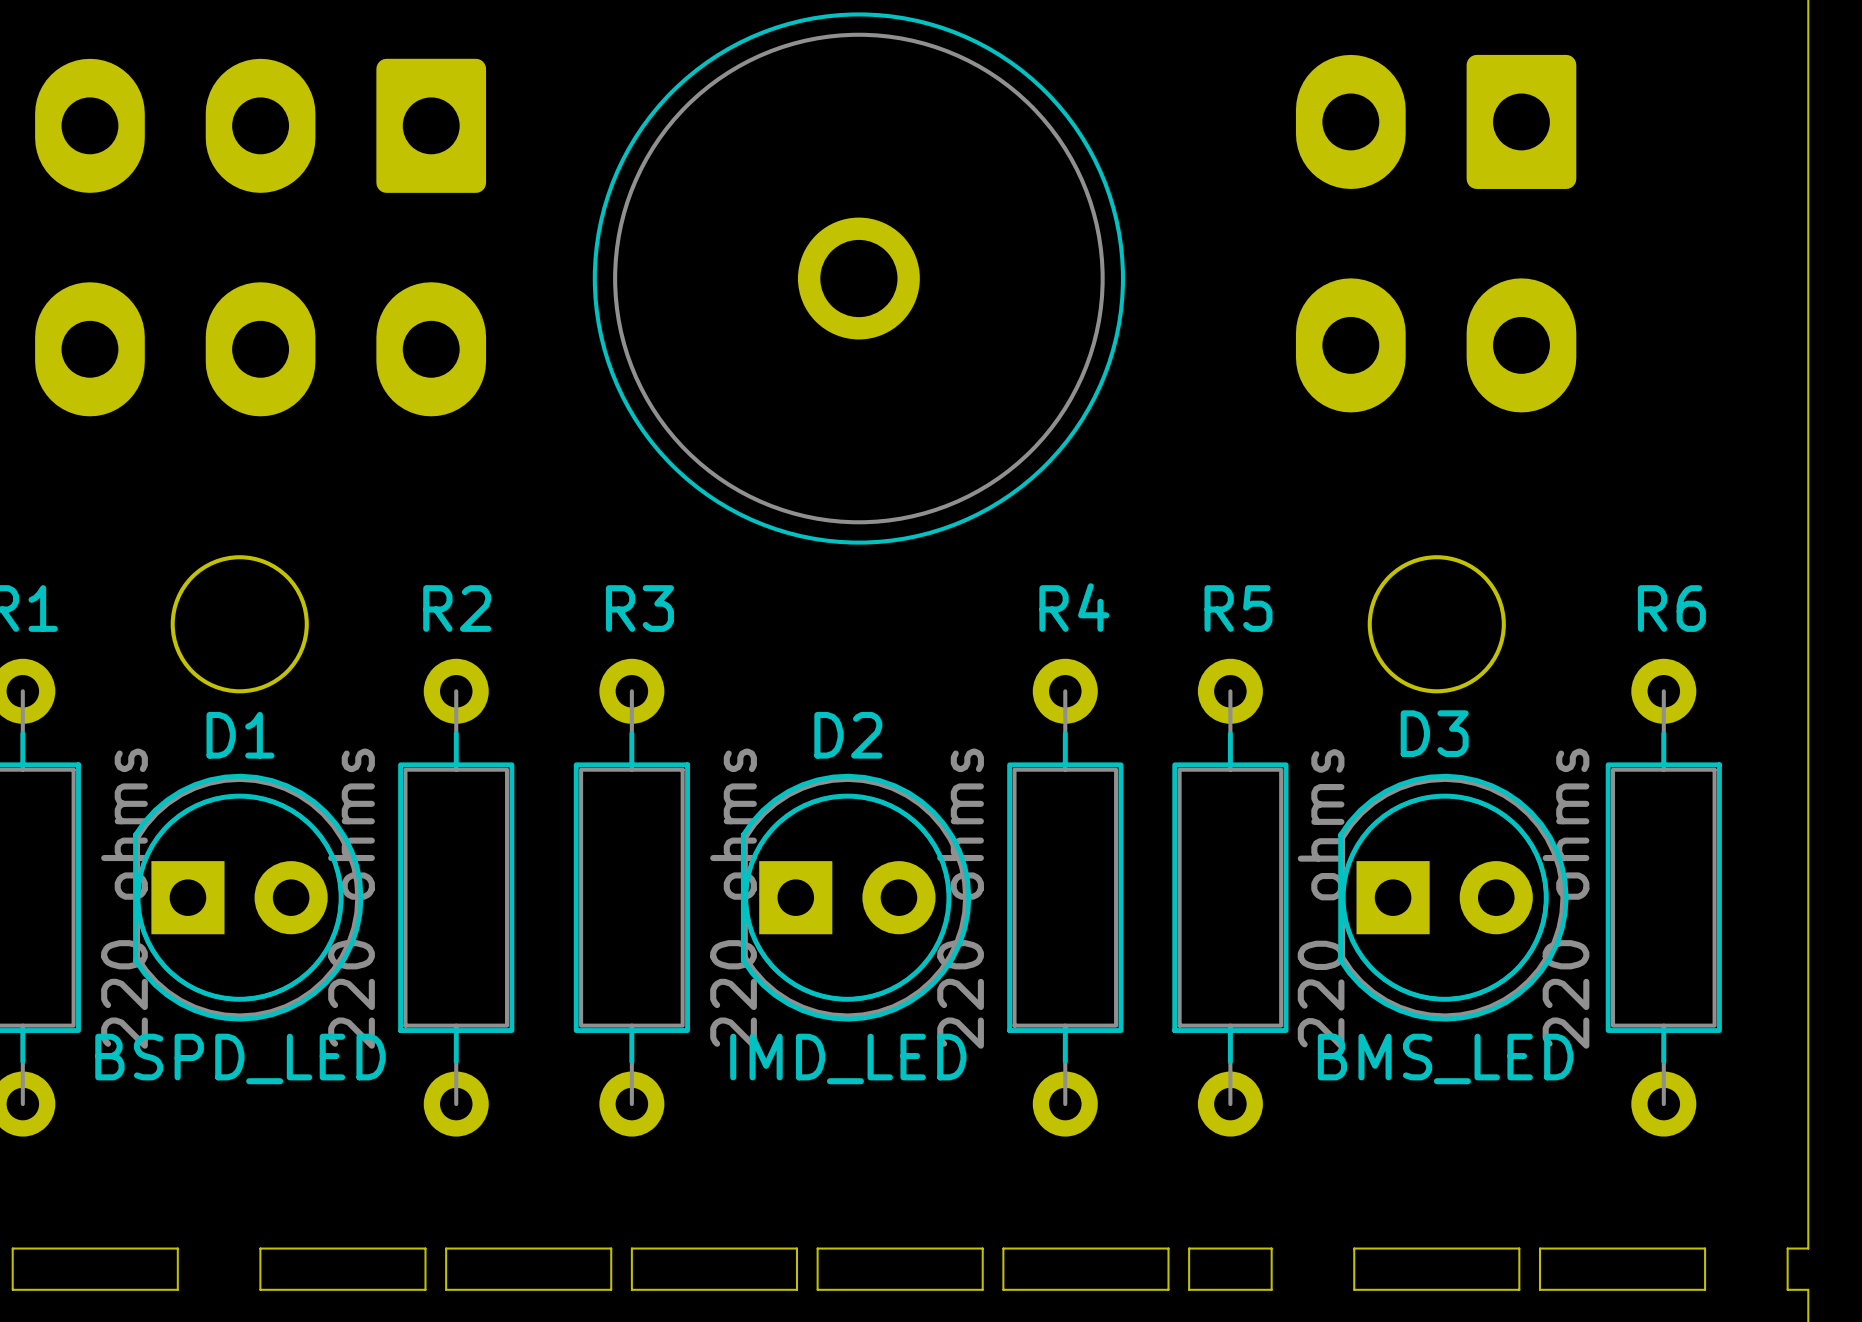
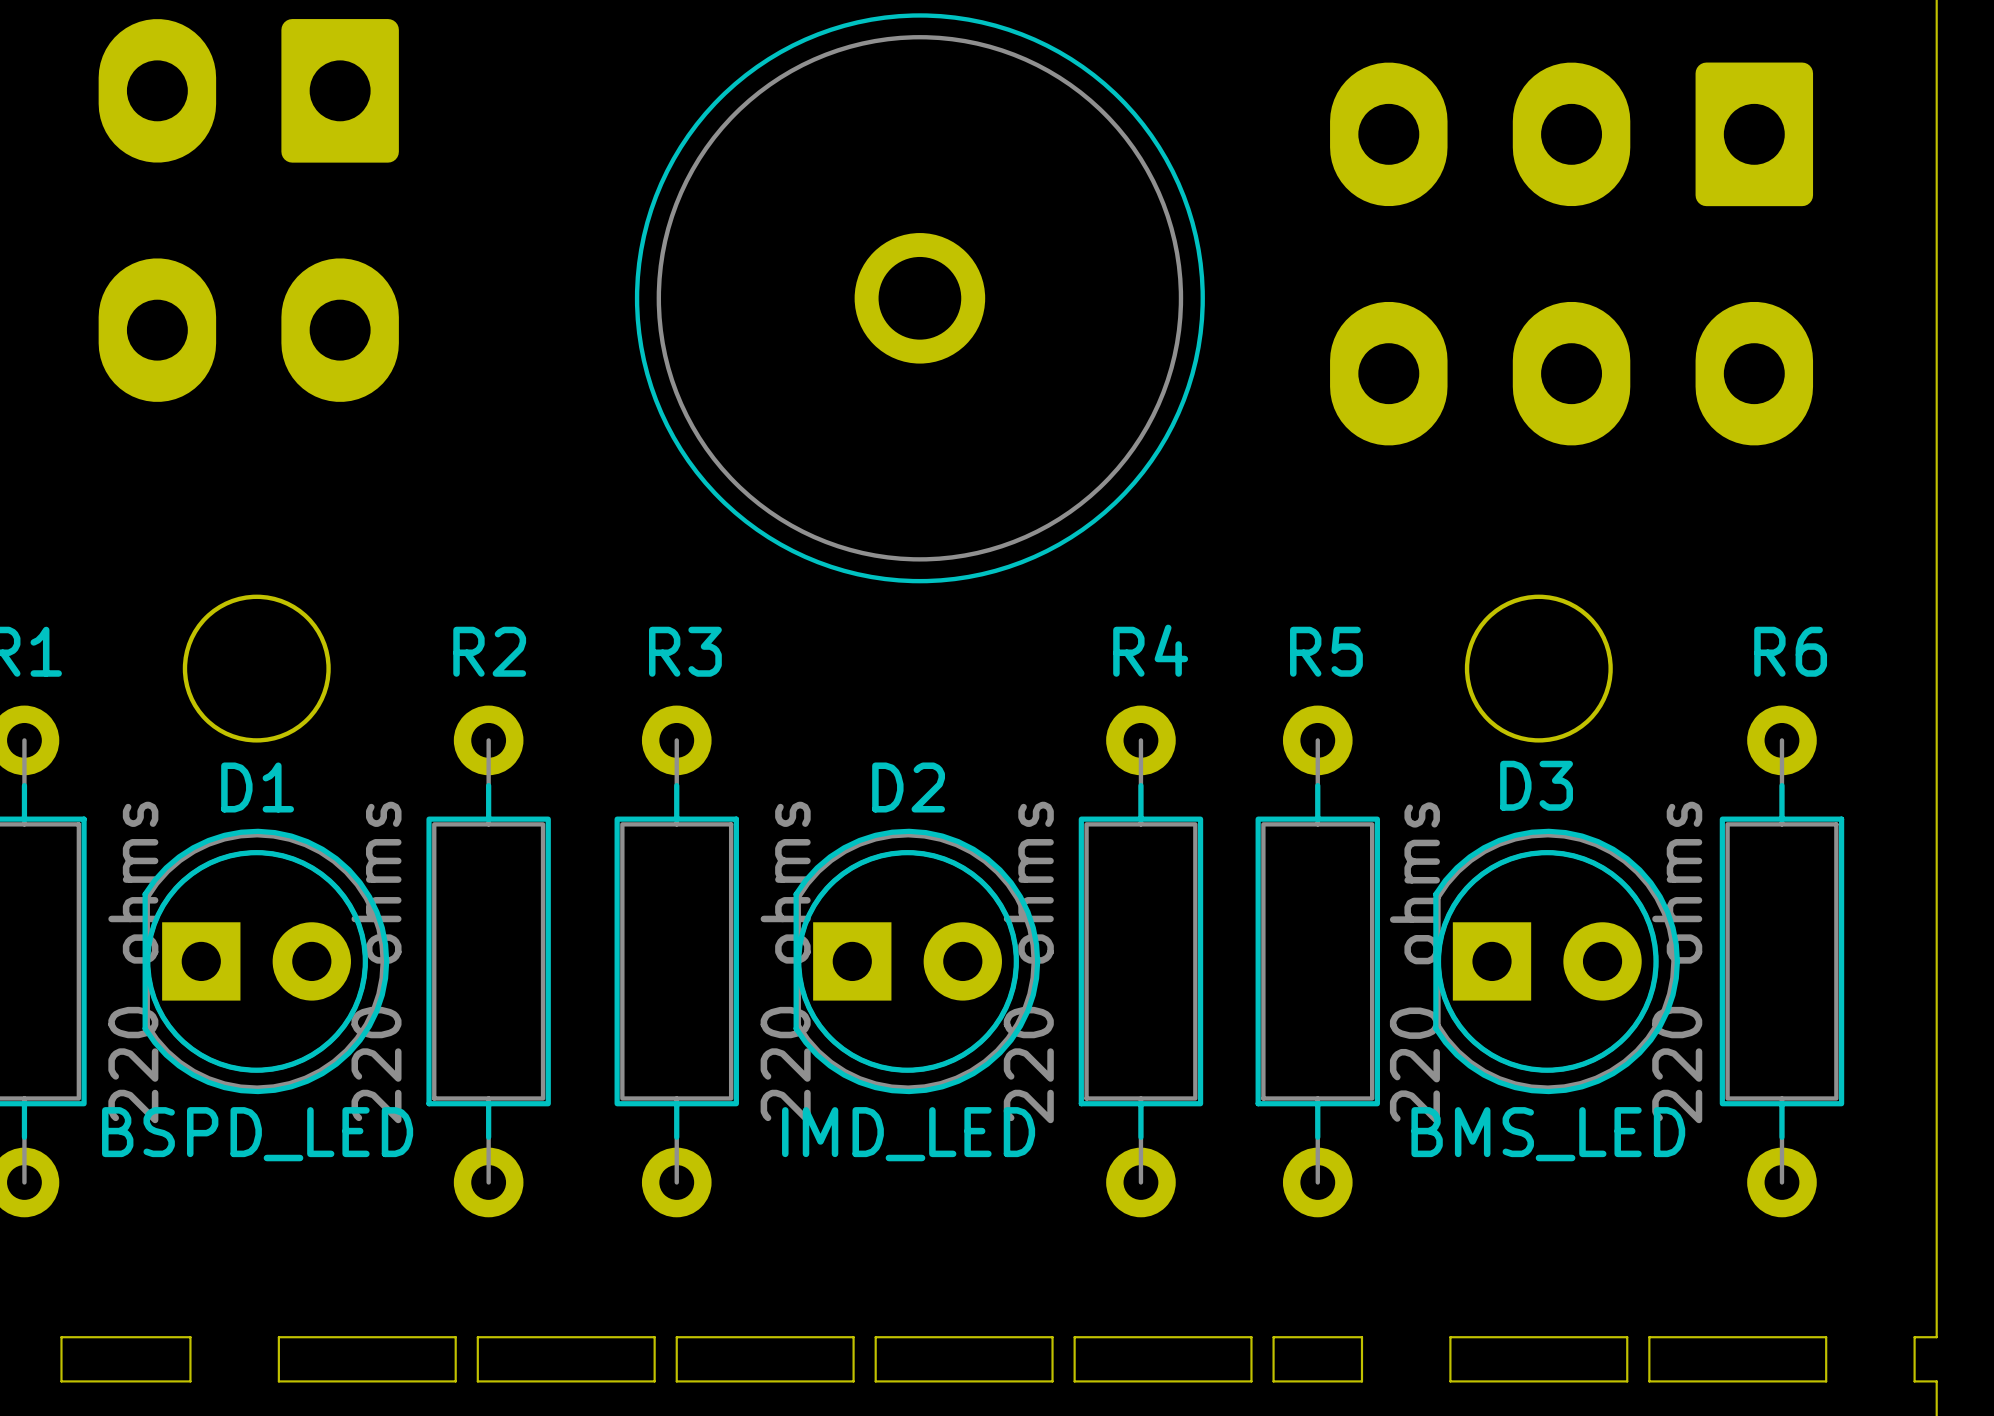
part footprint: [1295, 54, 1577, 413] -> [1330, 62, 1814, 446]
part: none -> (248, 210)
part: (260, 237) -> none
board edge: (57, 1248) (12, 1248) (12, 1289) (57, 1289) -> (61, 1337) (61, 1381)

